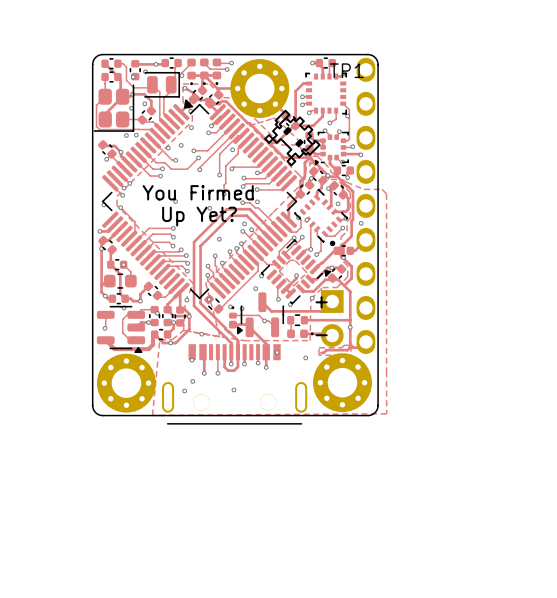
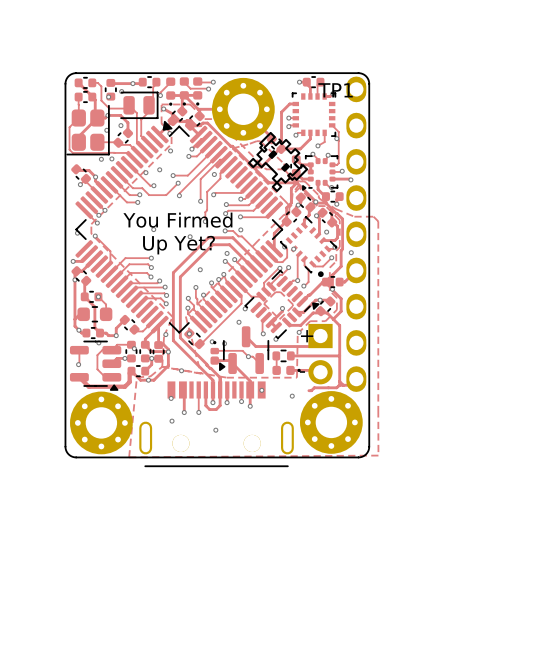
via: (350, 327) -> none
zone outline: (344, 345) (341, 347) (318, 347) (318, 354) (350, 355) (350, 345) (344, 345) -> none
via: (184, 390) -> none

